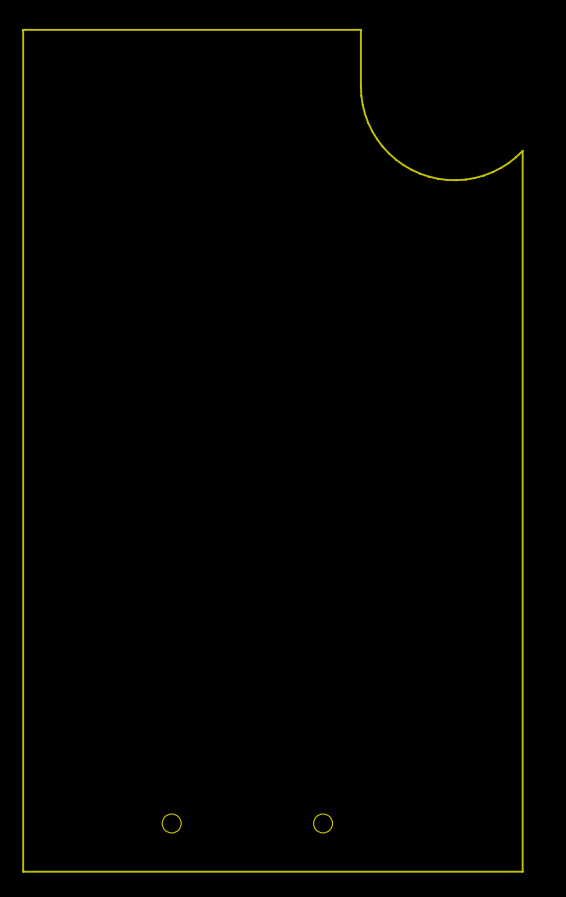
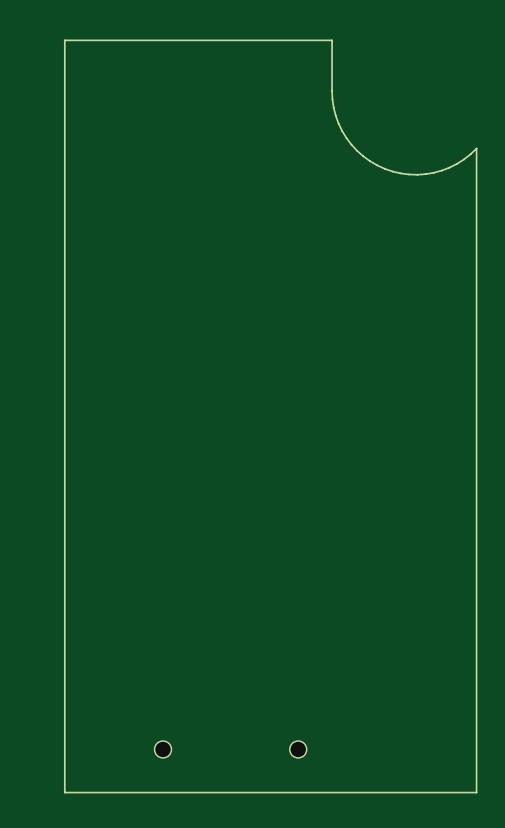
board edge: (61, 29) (23, 29) (23, 871) (61, 871) -> (64, 40) (64, 792)

